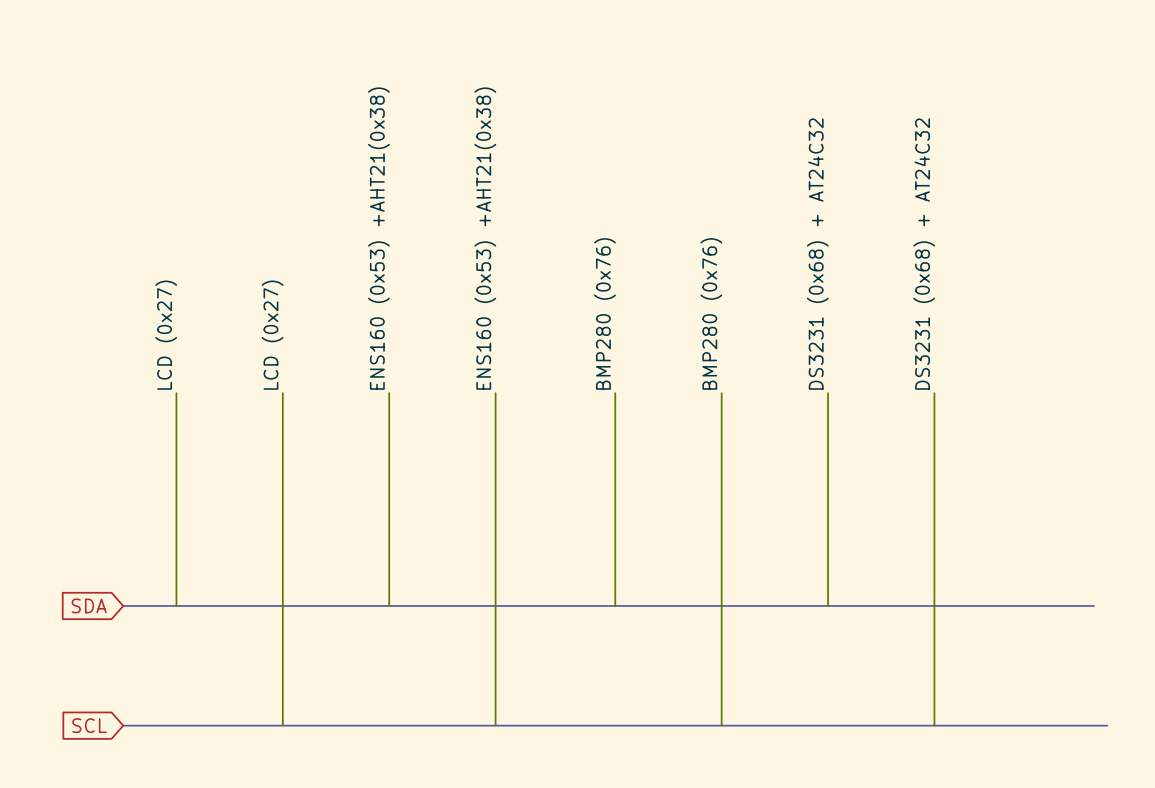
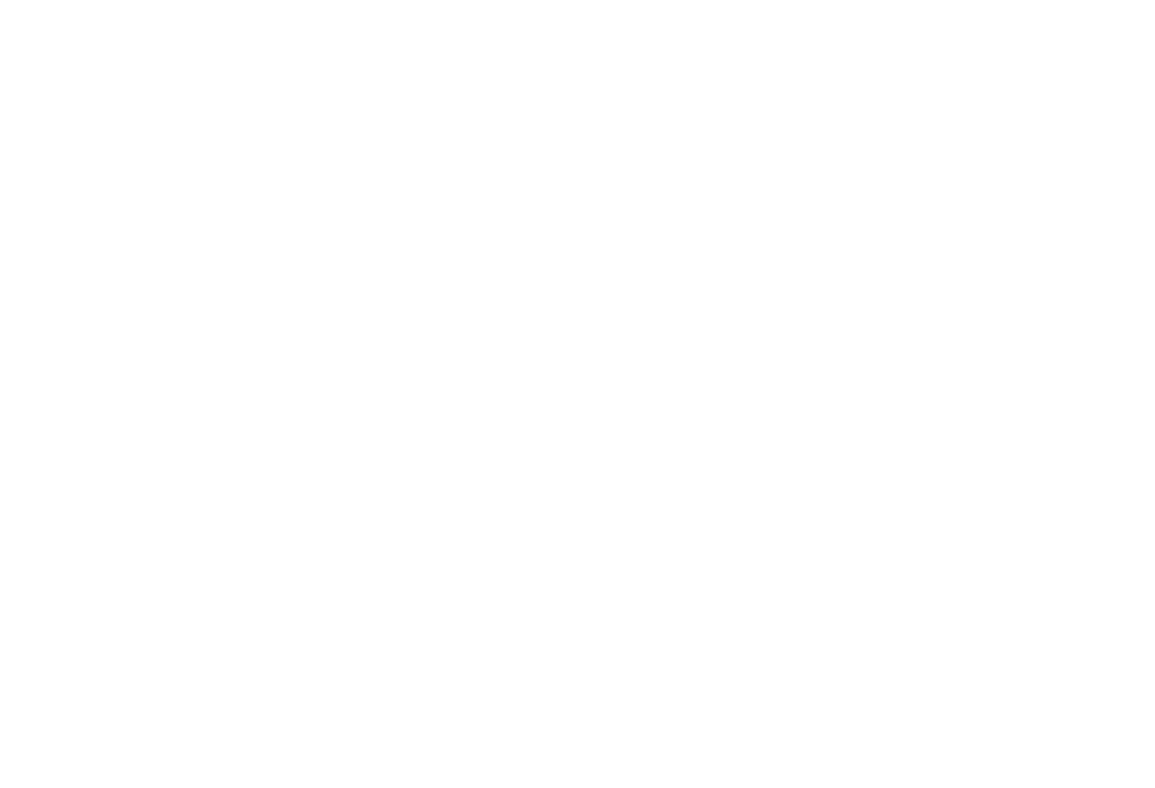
label: ENS160 (0x53) +AHT21(0x38) (378, 238) -> none
label: ENS160 (0x53) +AHT21(0x38) (485, 238) -> none
label: DS3231 (0x68) + AT24C32 (817, 254) -> none
label: DS3231 (0x68) + AT24C32 (924, 254) -> none
label: BMP280 (0x76) (604, 313) -> none
label: BMP280 (0x76) (711, 313) -> none
label: LCD (0x27) (166, 335) -> none
label: LCD (0x27) (272, 335) -> none
wire: (176, 393) (176, 605) -> none
wire: (282, 393) (282, 725) -> none
wire: (389, 393) (389, 605) -> none
wire: (495, 393) (495, 725) -> none
wire: (615, 393) (615, 605) -> none
wire: (721, 393) (721, 725) -> none
wire: (828, 393) (828, 605) -> none
wire: (934, 393) (934, 725) -> none
global label: SDA (89, 605) -> none
bus: (123, 605) (1094, 605) -> none
global label: SCL (89, 725) -> none
bus: (123, 725) (1107, 725) -> none

